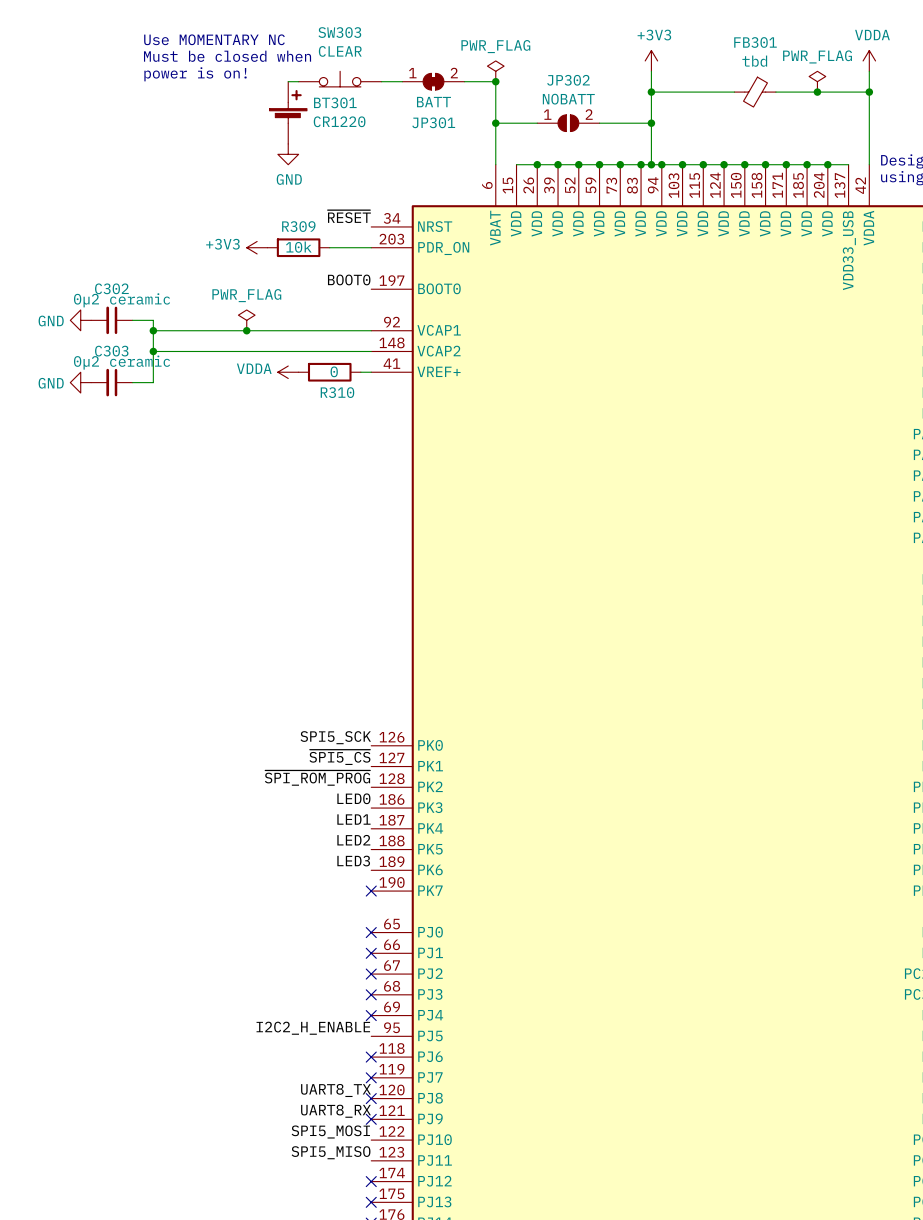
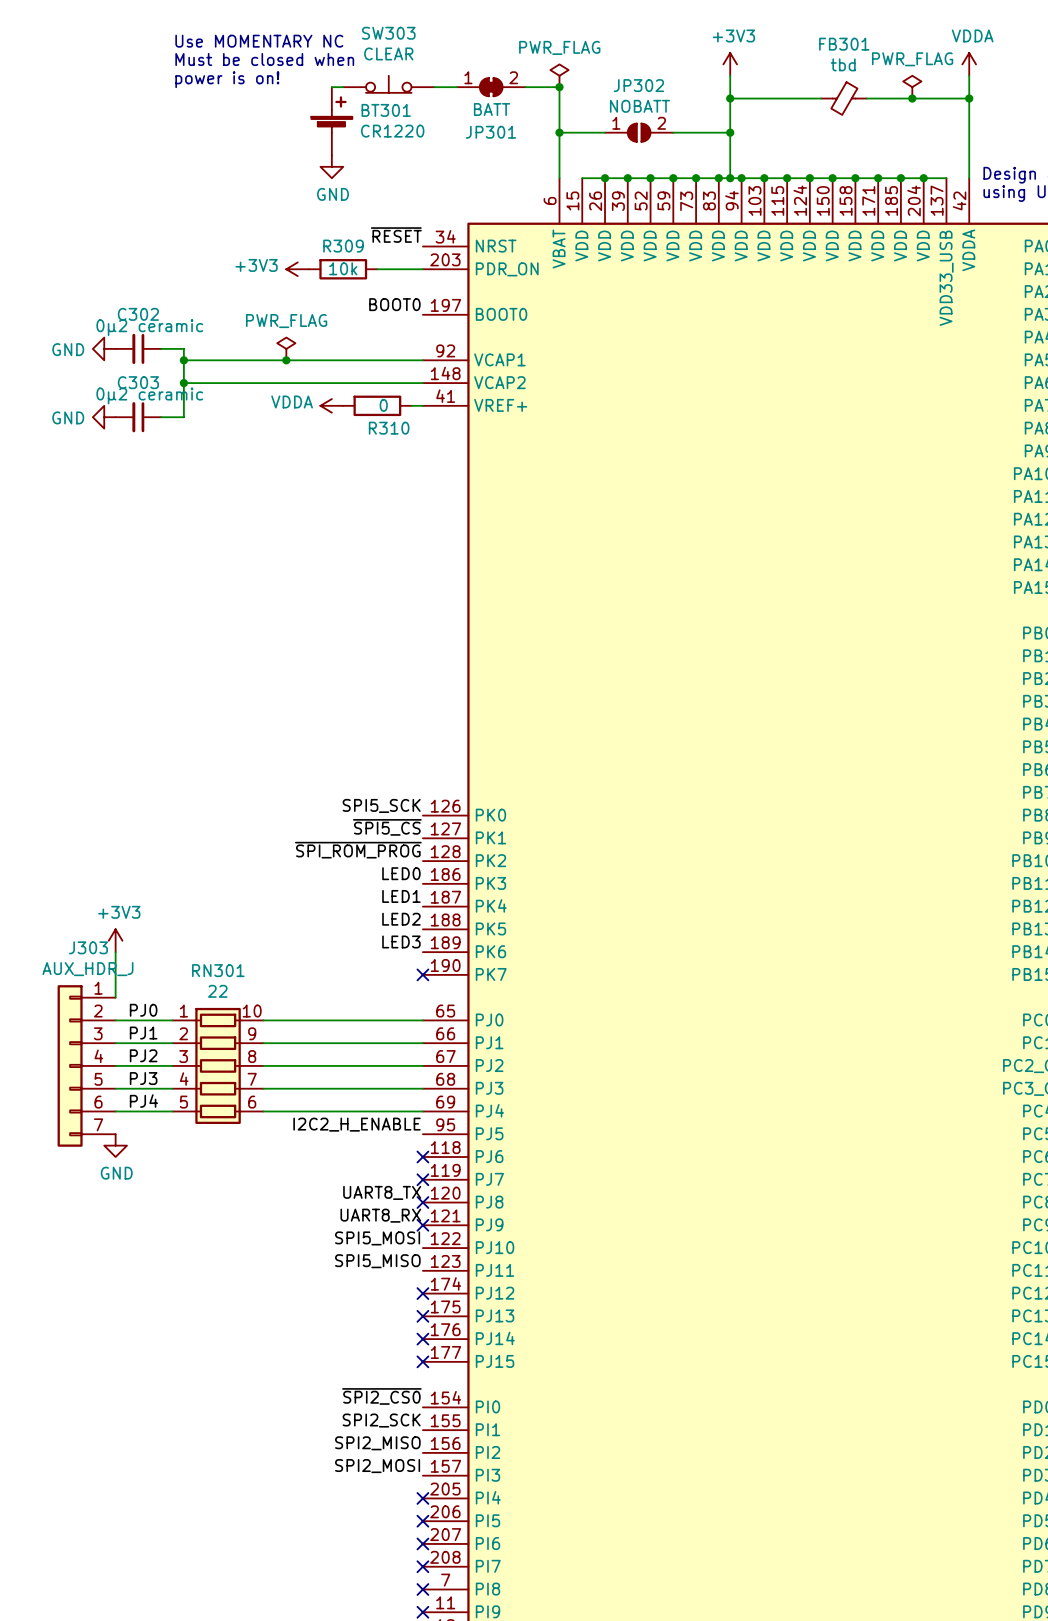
power symbol: none -> +3V3 (115, 940)
wire: none -> (115, 952) (115, 997)
label: none -> PJ0 (143, 1010)
wire: none -> (115, 1020) (172, 1020)
wire: none -> (263, 1020) (422, 1020)
no-connect mark: (371, 932) -> none
label: none -> PJ1 (143, 1033)
wire: none -> (115, 1043) (172, 1043)
wire: none -> (263, 1043) (422, 1043)
no-connect mark: (371, 953) -> none
label: none -> PJ2 (143, 1055)
J303: none -> AUX_HDR_J (86, 1065)
wire: none -> (115, 1065) (172, 1065)
RN301: none -> 22 (218, 1065)
wire: none -> (263, 1065) (422, 1065)
no-connect mark: (371, 974) -> none
label: none -> PJ3 (143, 1078)
wire: none -> (115, 1088) (172, 1088)
wire: none -> (263, 1088) (422, 1088)
no-connect mark: (371, 994) -> none
label: none -> PJ4 (143, 1101)
wire: none -> (115, 1111) (172, 1111)
wire: none -> (263, 1111) (422, 1111)
no-connect mark: (371, 1015) -> none
power symbol: none -> GND (115, 1145)

